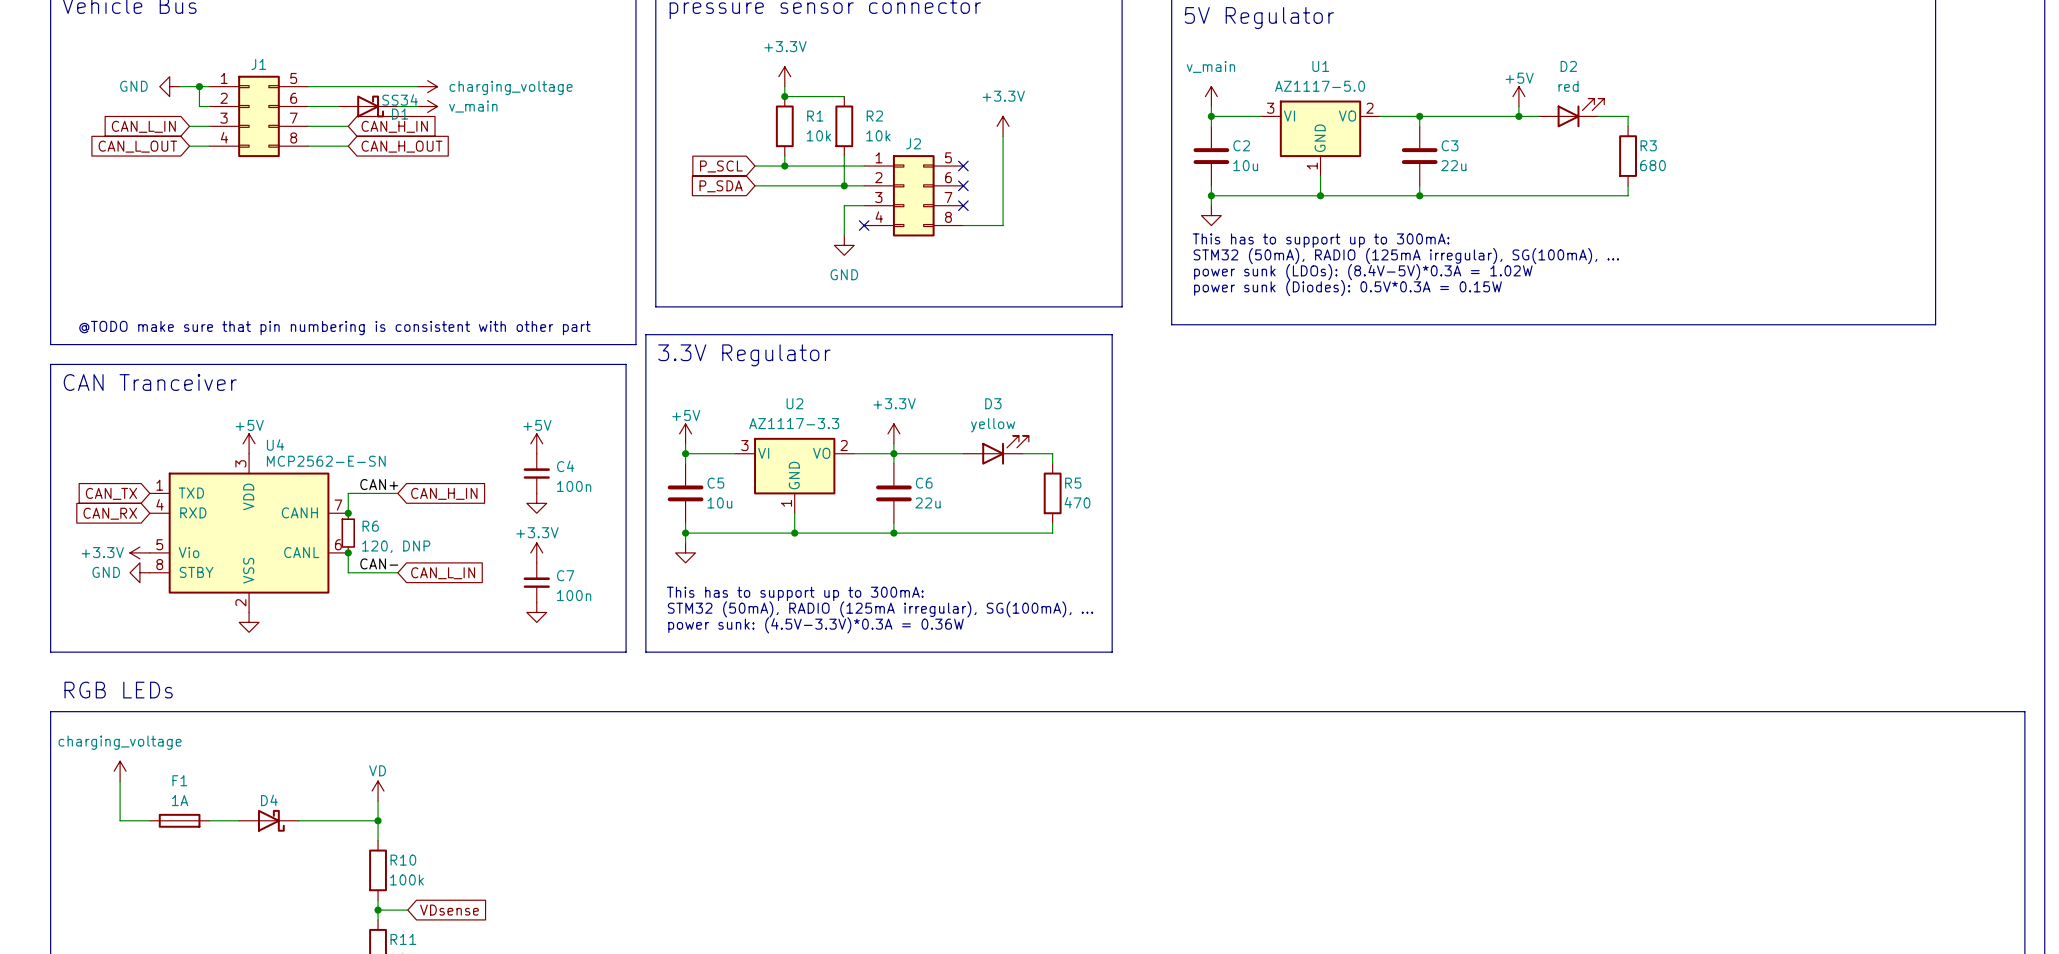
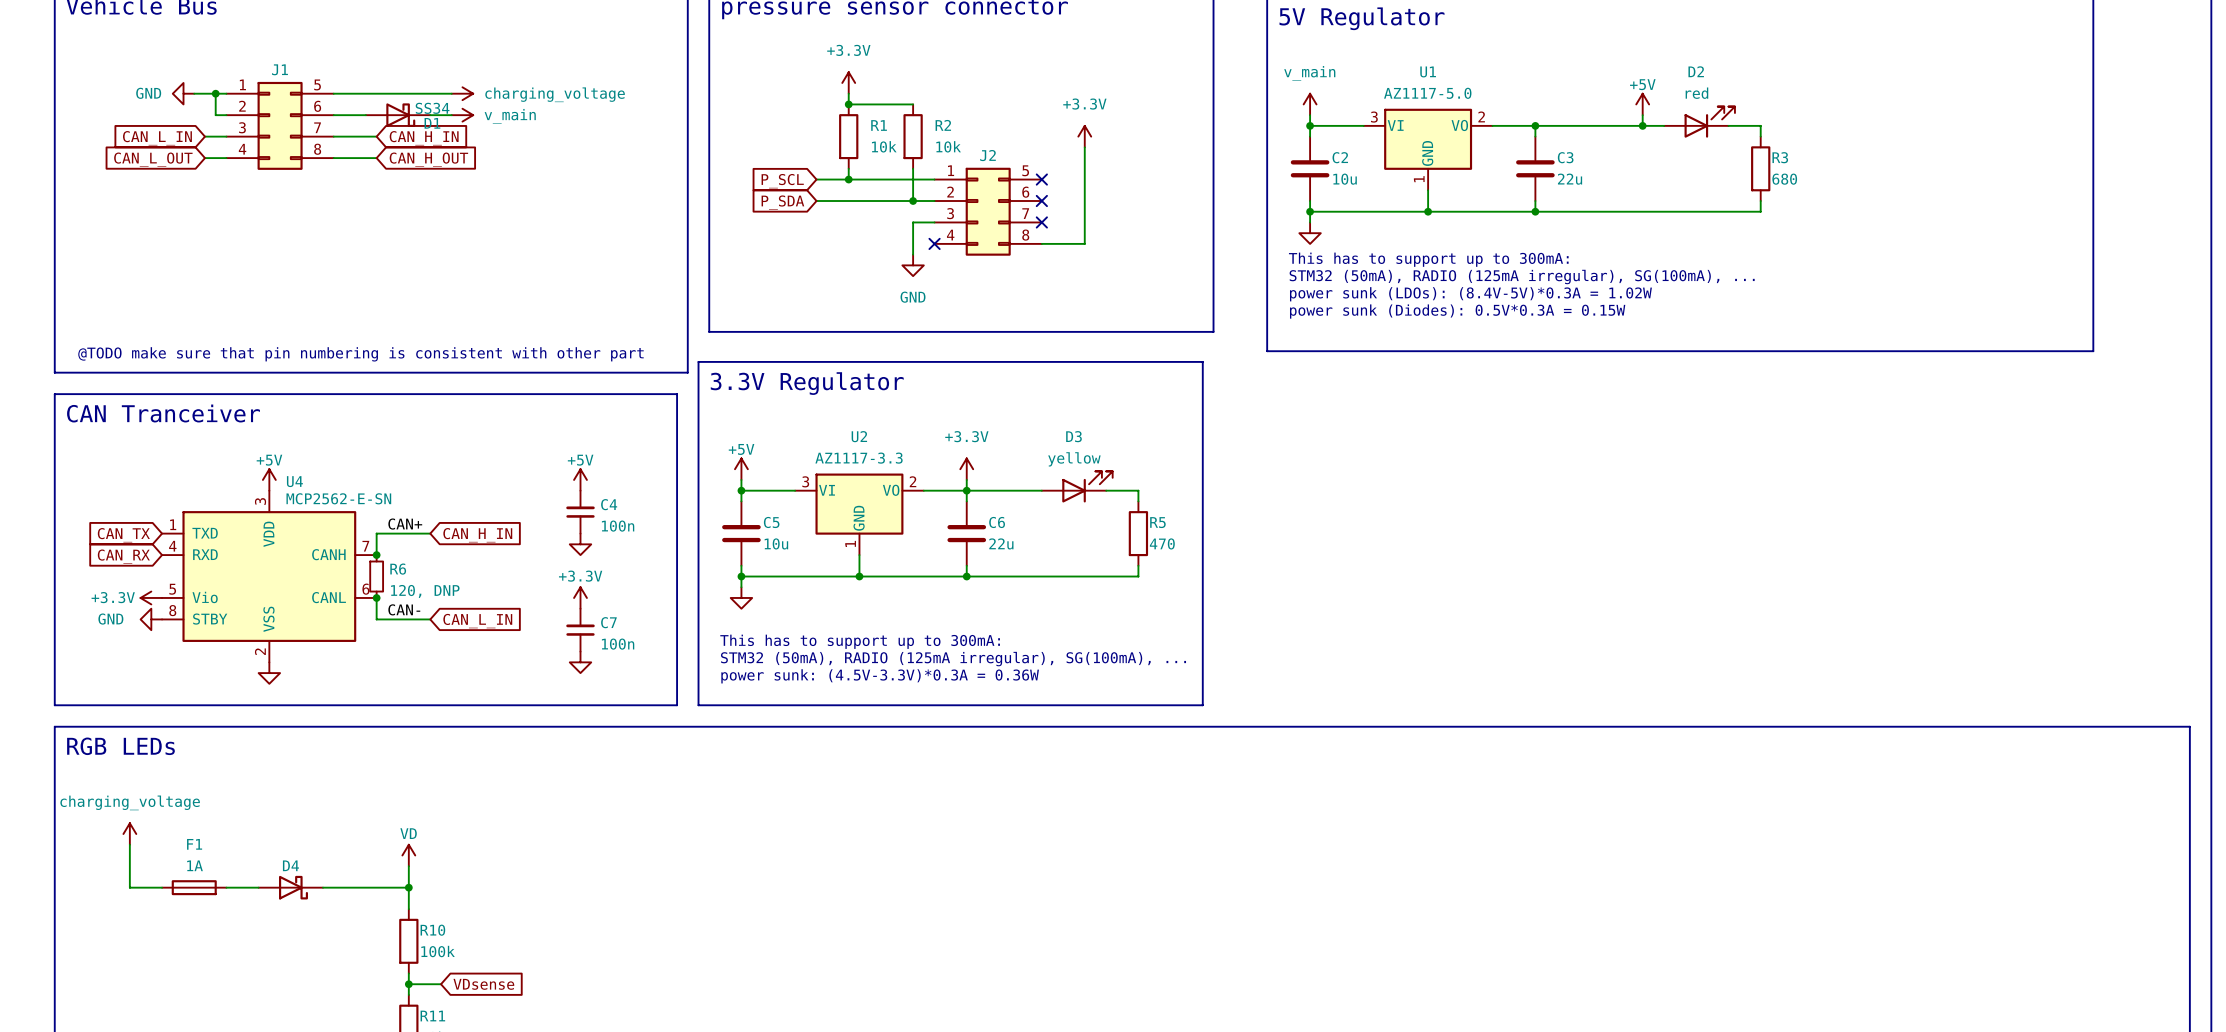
line: (50, 711) (2024, 711) -> (54, 769) (54, 726) (2189, 726) (2189, 769)

